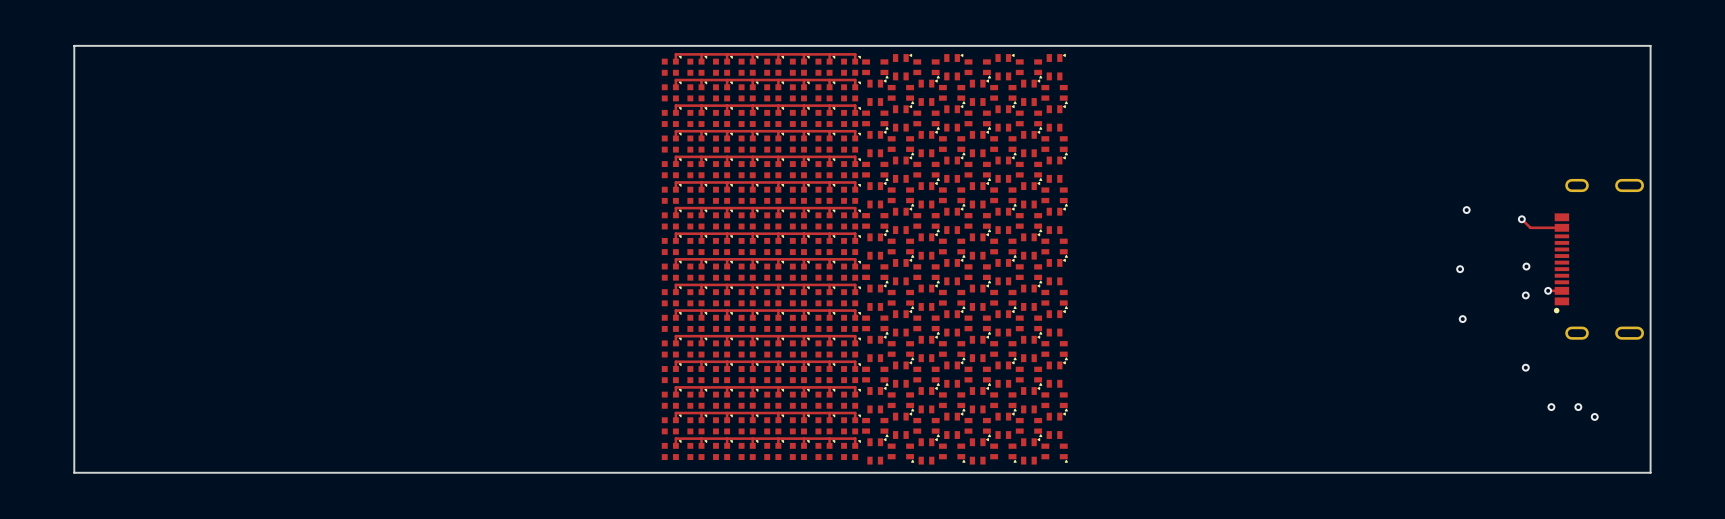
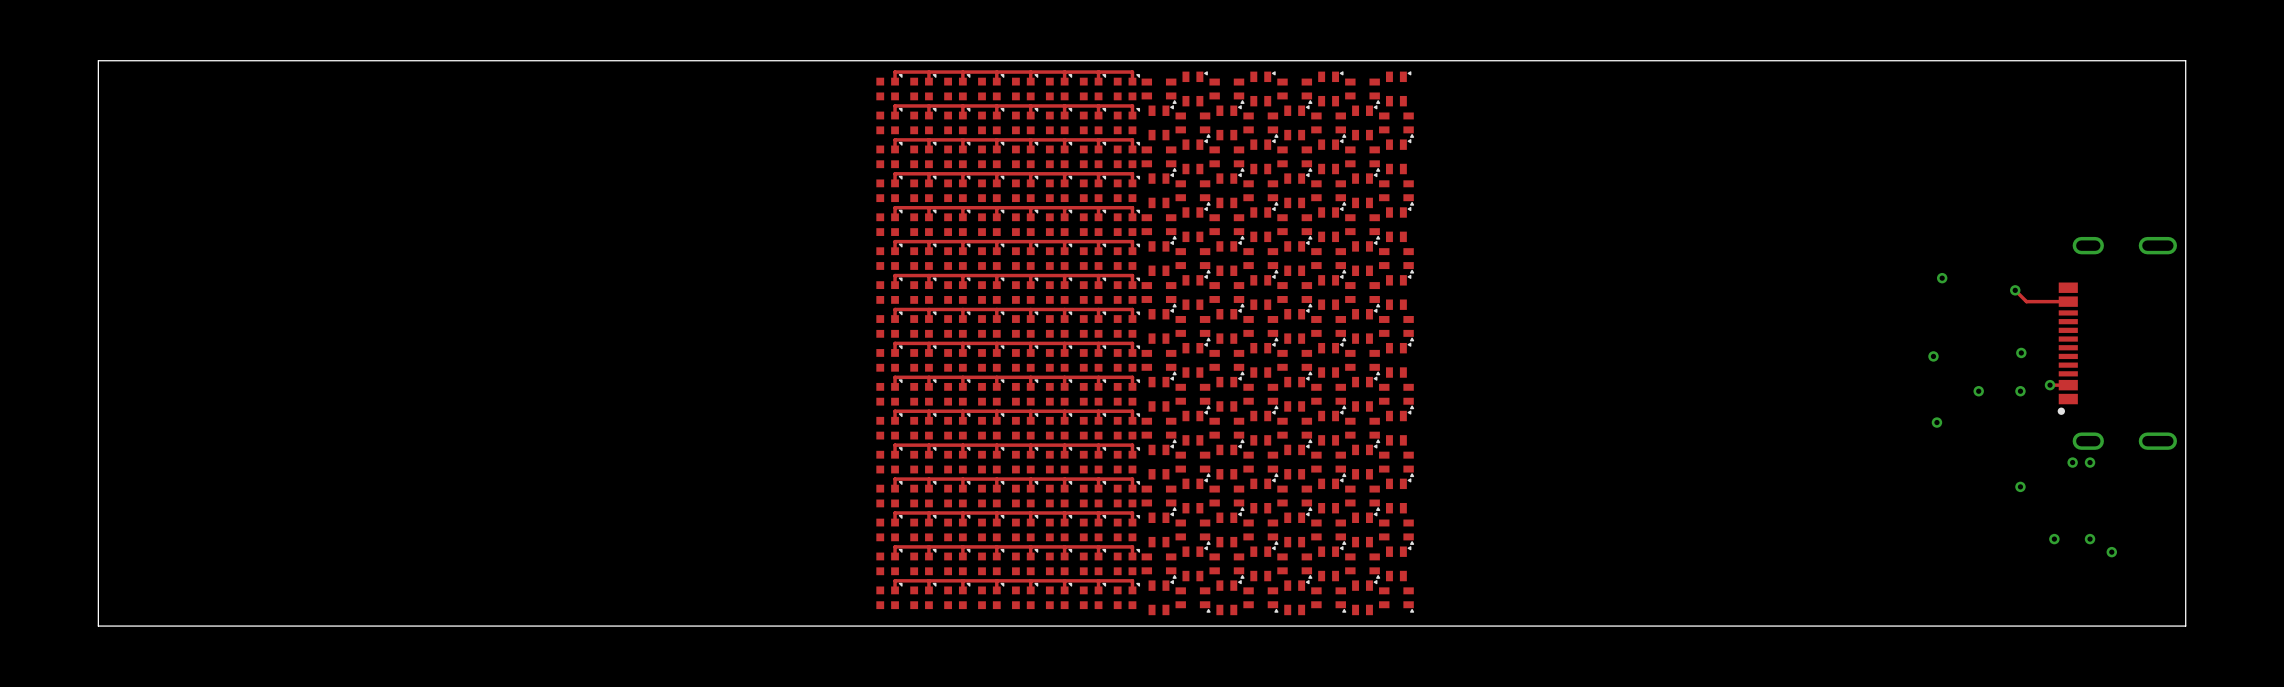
via: none -> (1978, 391)
via: none -> (2072, 462)
via: none -> (2090, 462)

